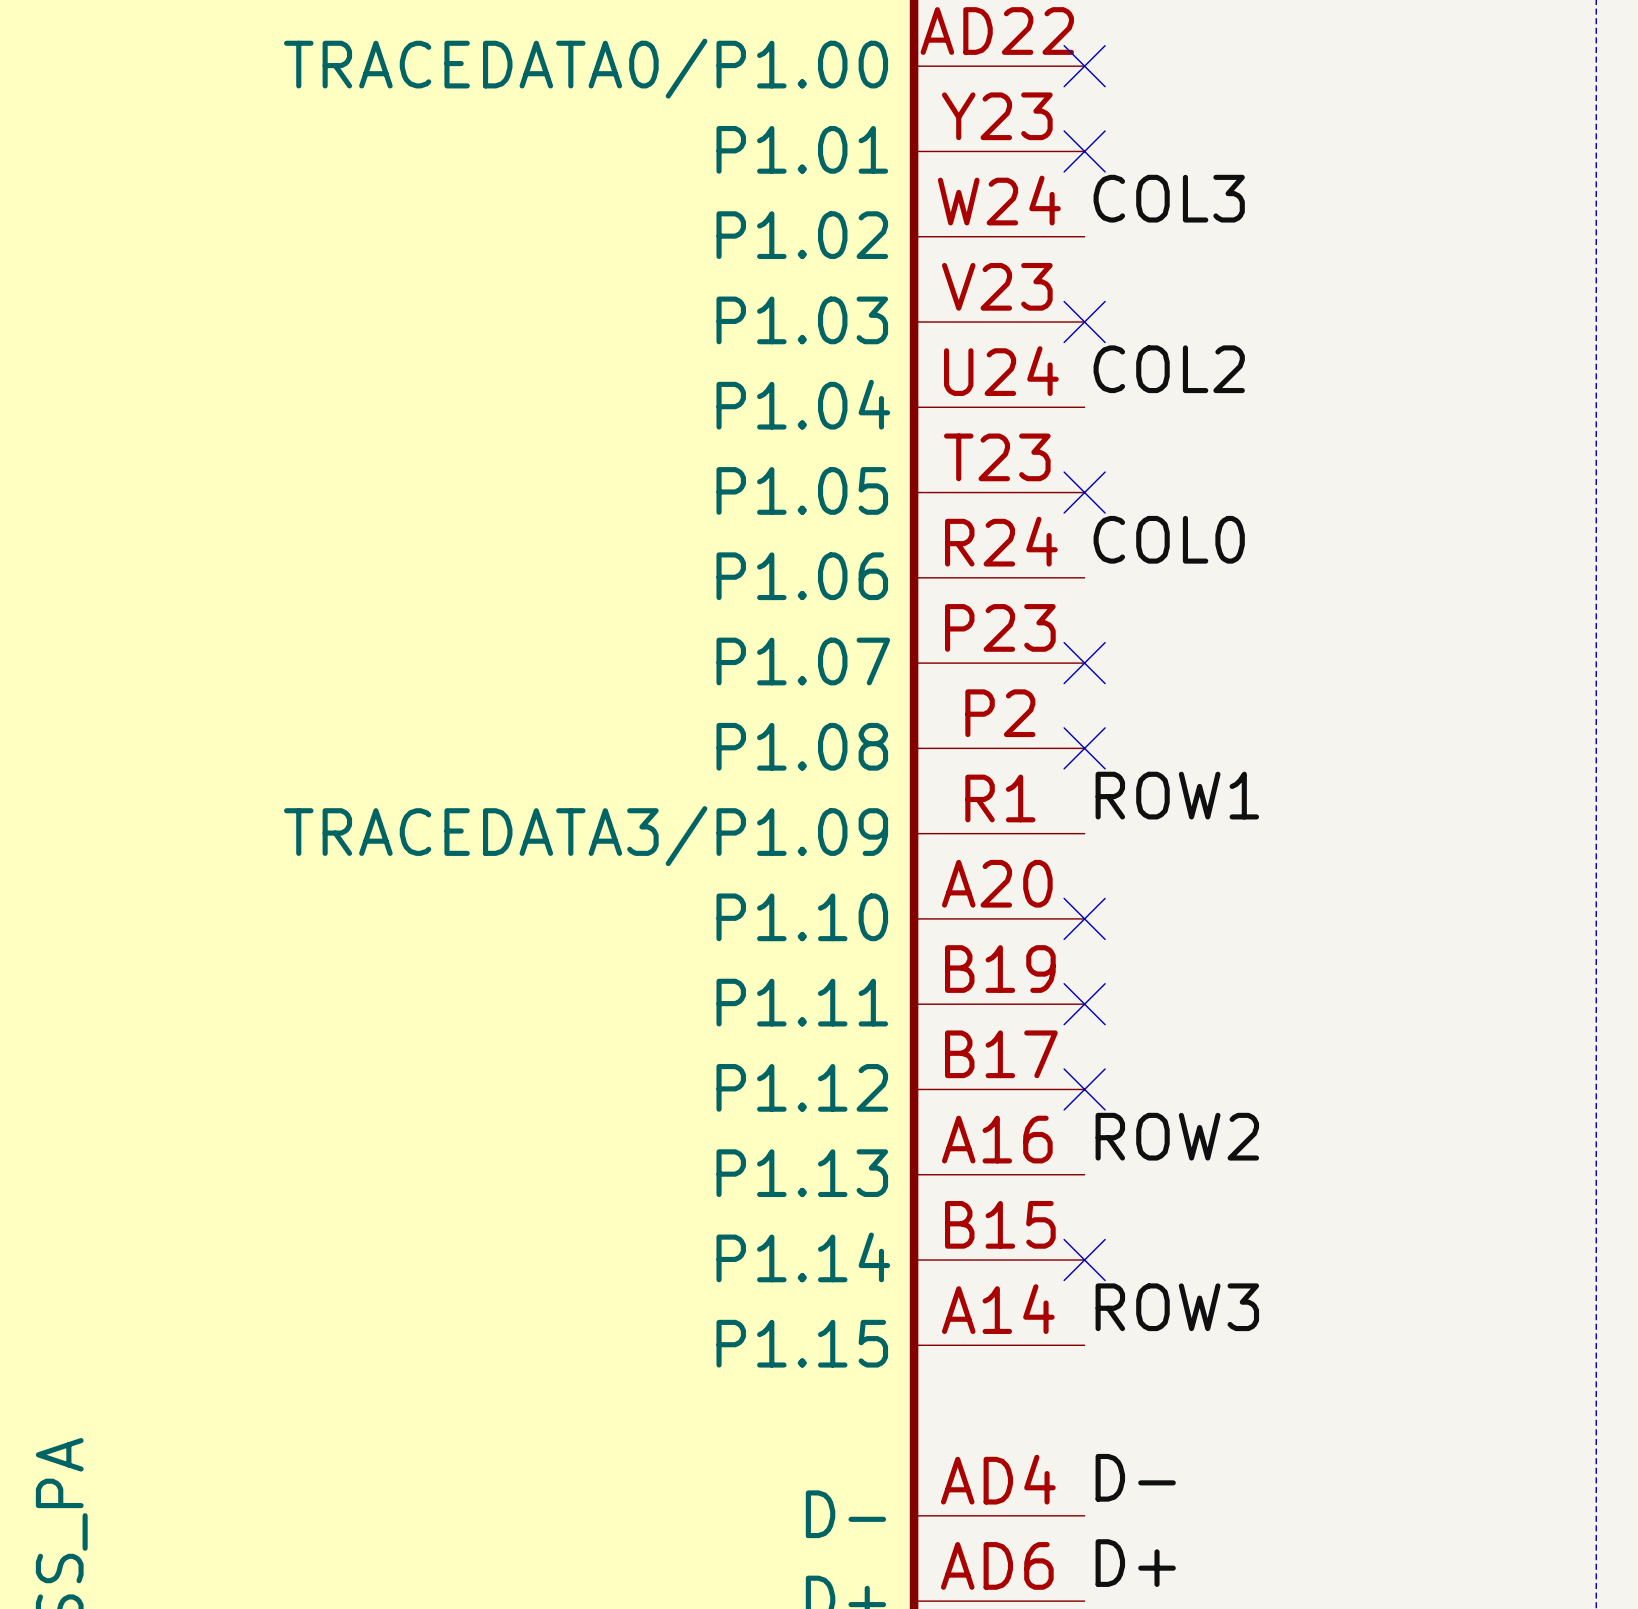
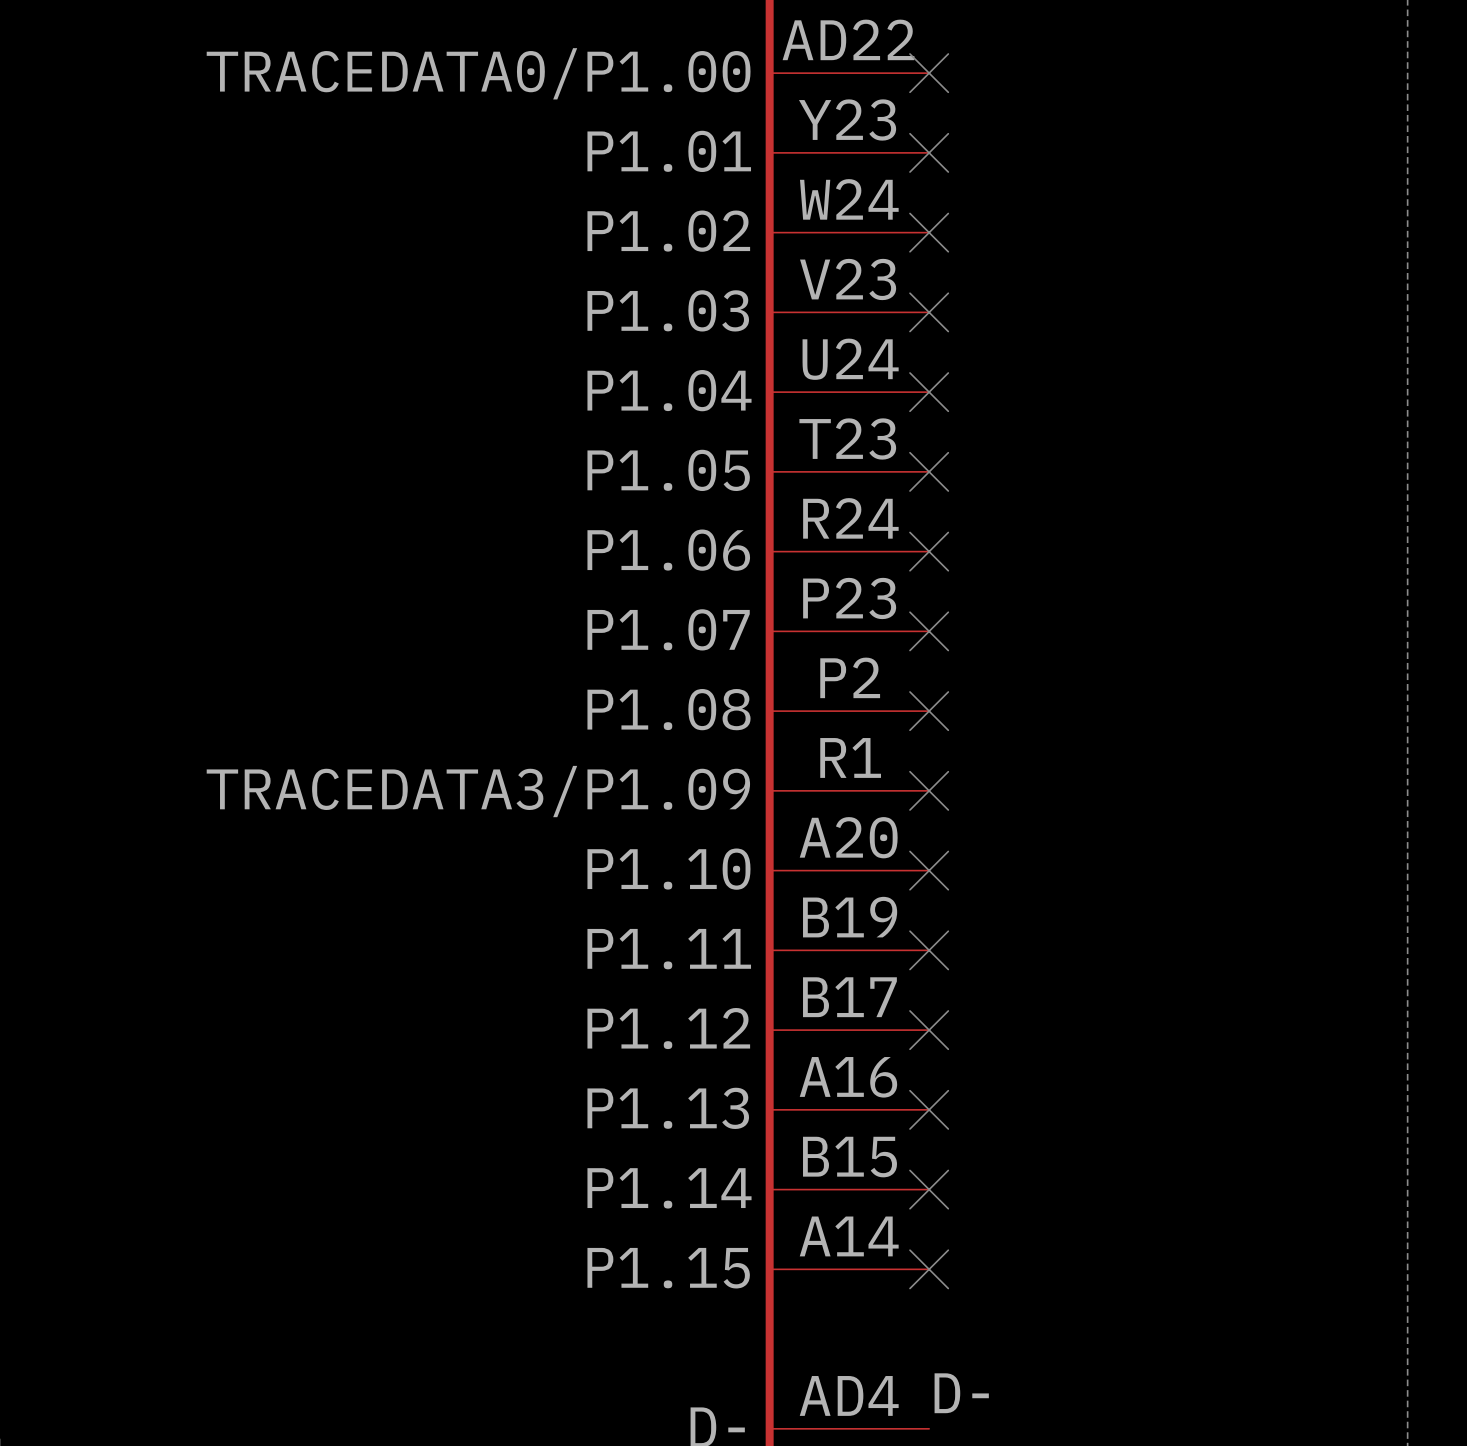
label: COL3 (1169, 198) -> none
no-connect mark: none -> (929, 232)
label: COL2 (1169, 369) -> none
no-connect mark: none -> (929, 392)
label: COL0 (1169, 539) -> none
no-connect mark: none -> (929, 551)
label: ROW1 (1177, 795) -> none
no-connect mark: none -> (929, 790)
label: ROW2 (1177, 1136) -> none
no-connect mark: none -> (929, 1109)
label: ROW3 (1177, 1307) -> none
no-connect mark: none -> (929, 1269)

